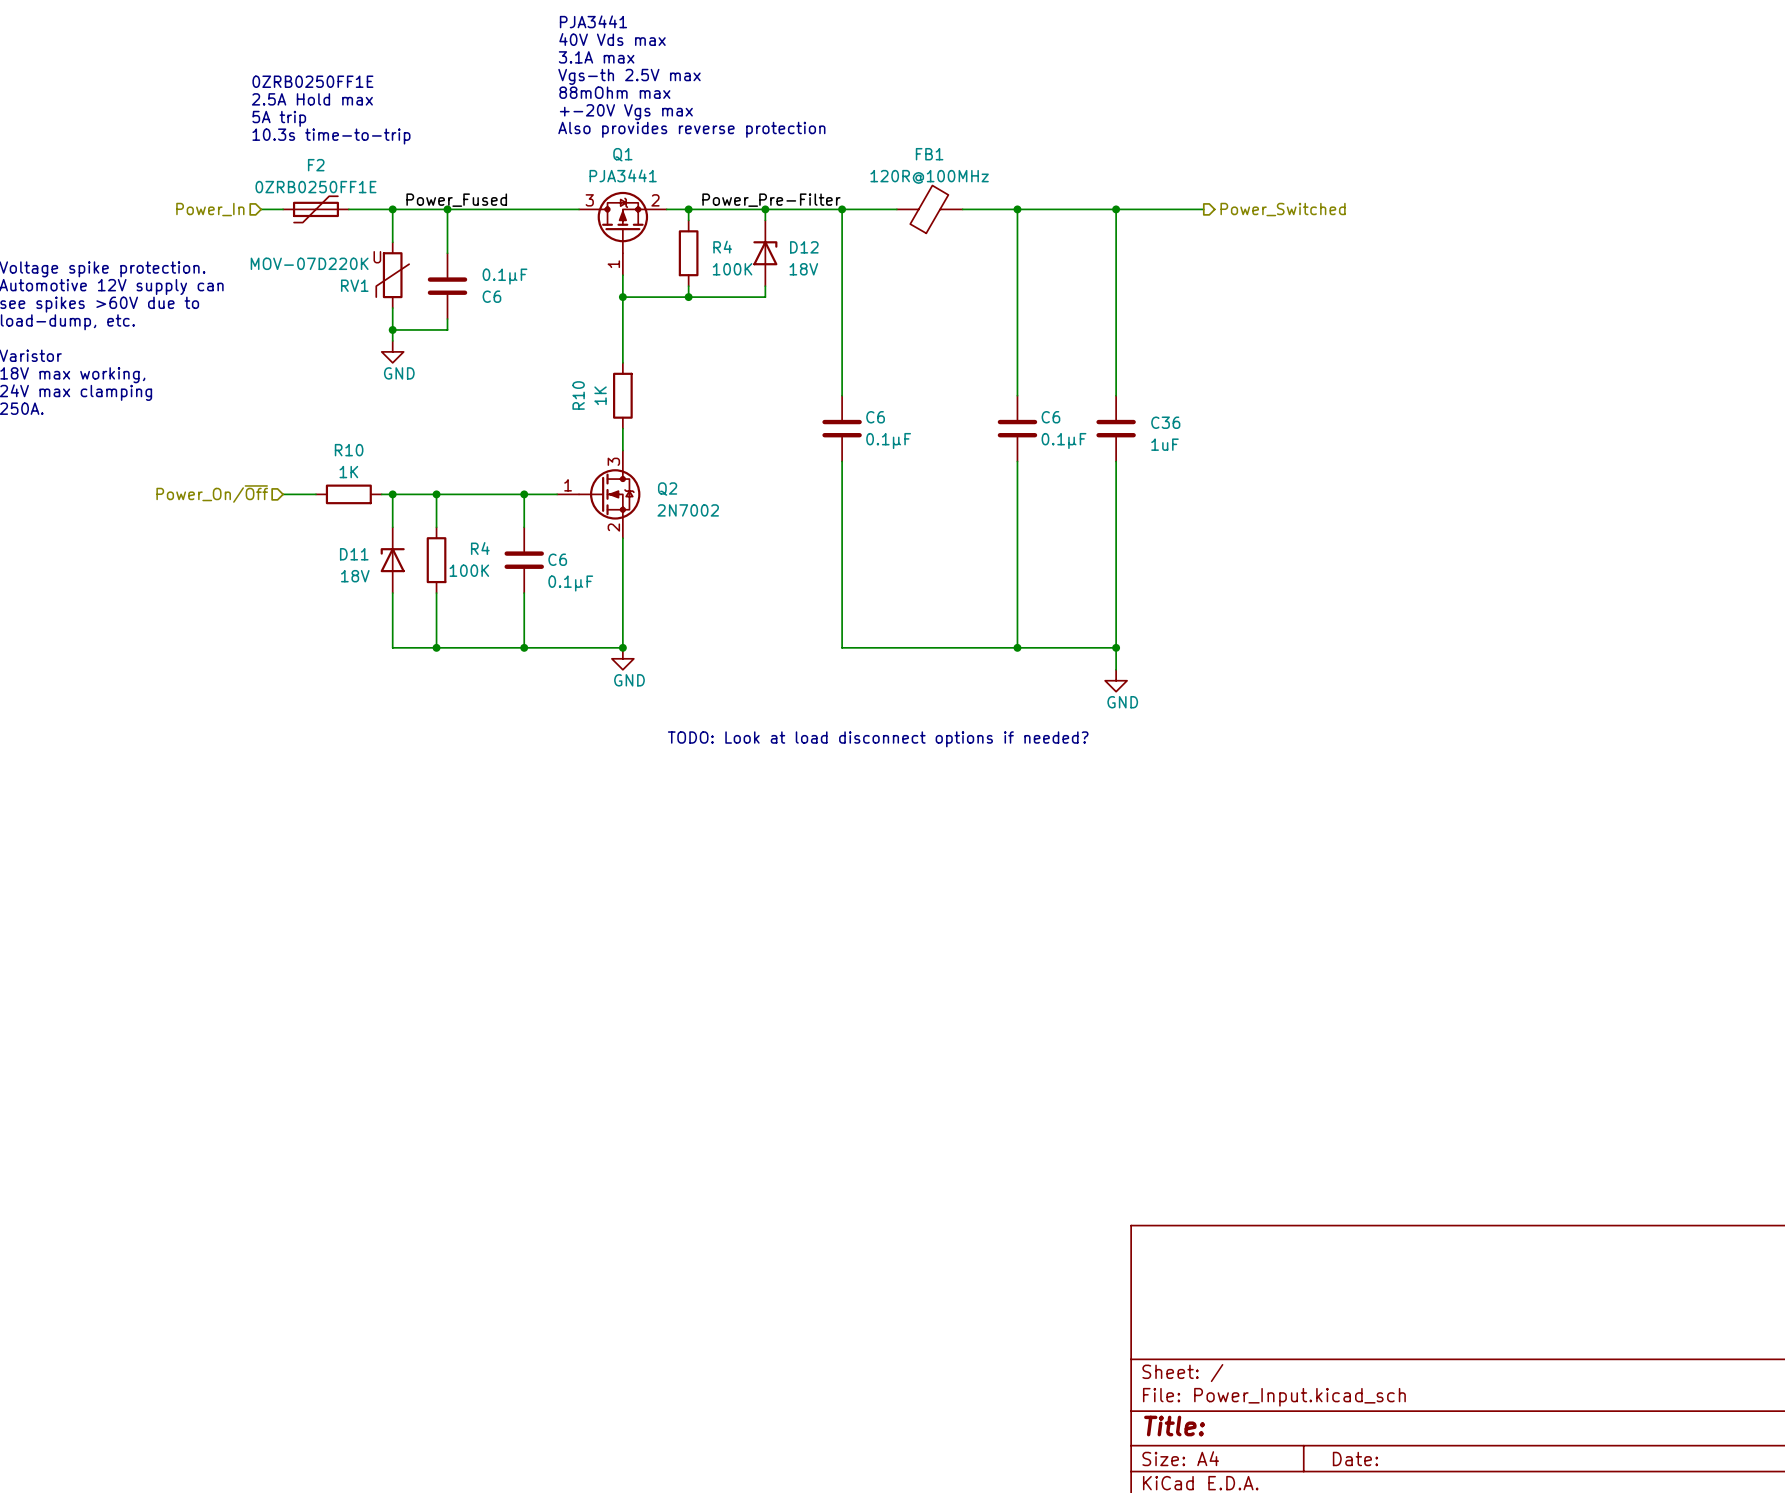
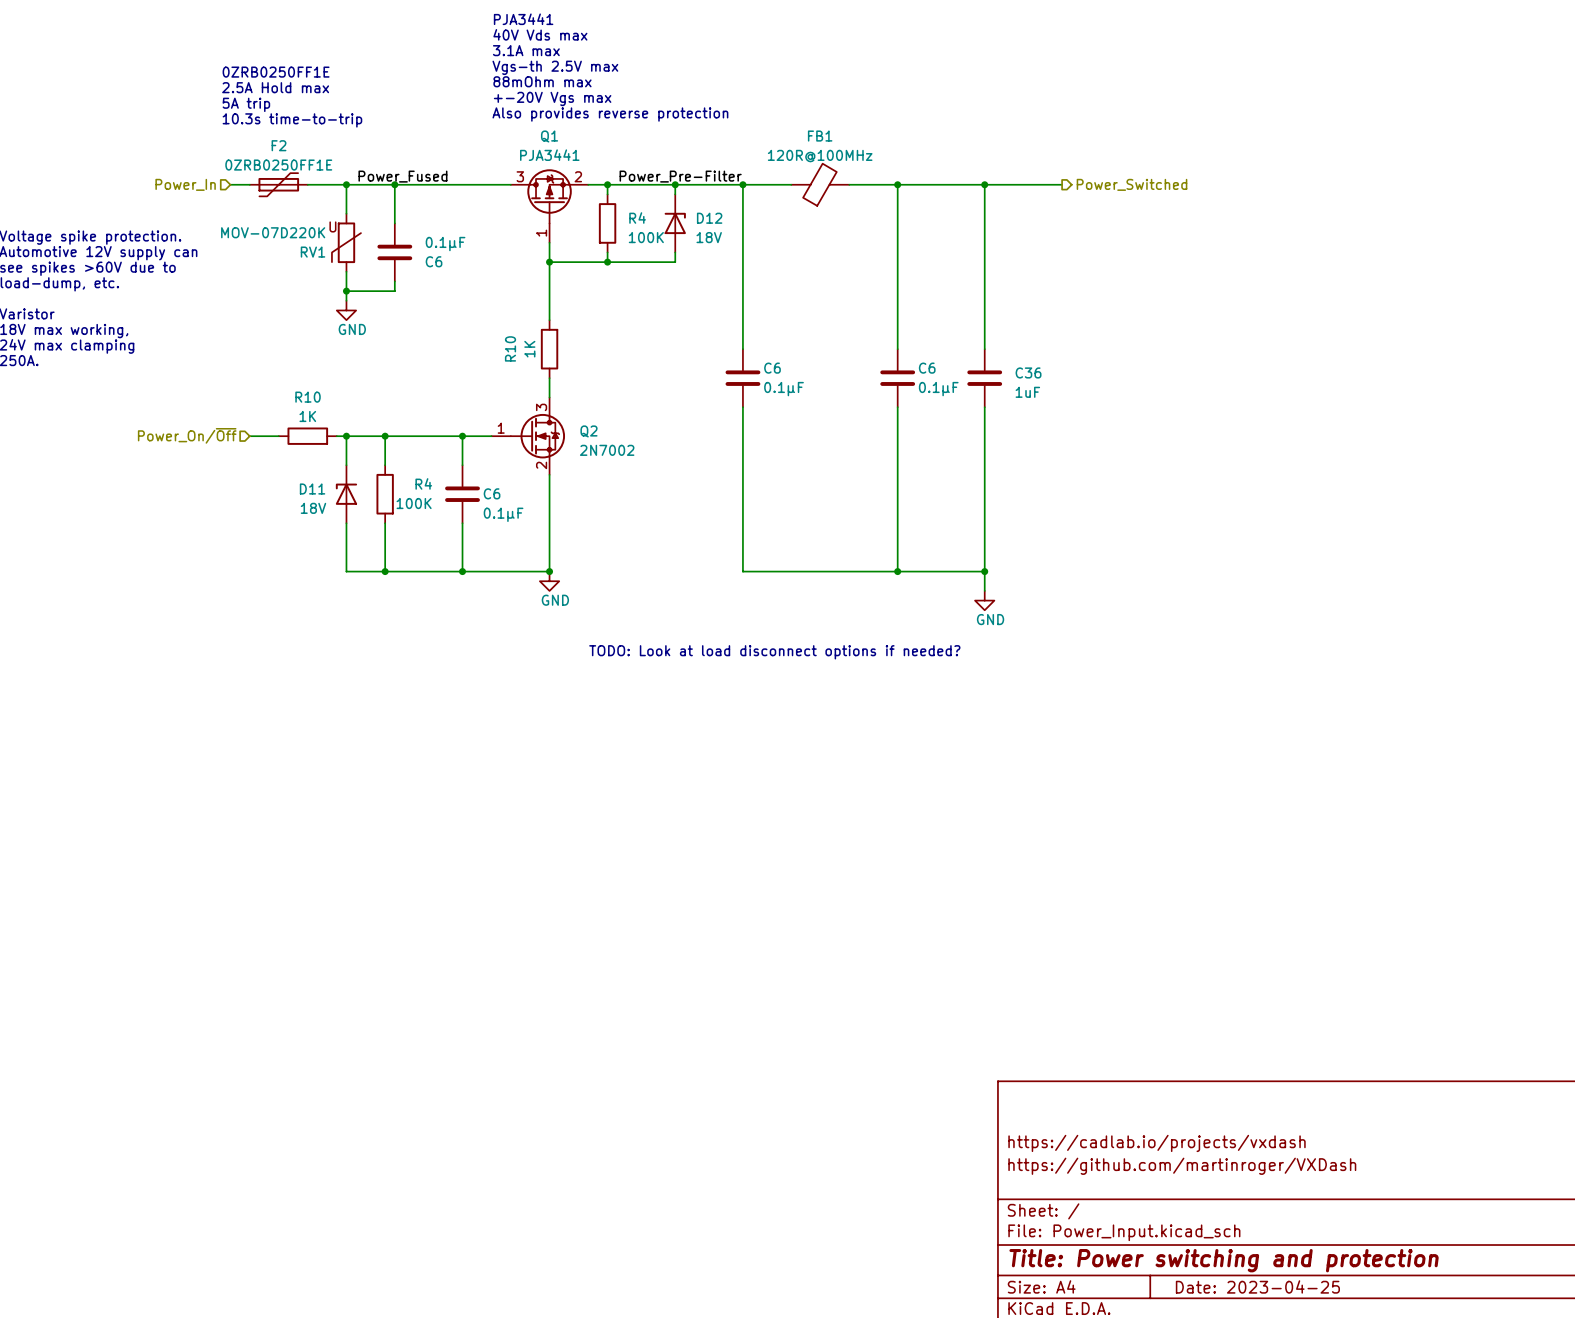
title block: none -> https://cadlab.io/projects/vxdash (1157, 1143)
title block: none -> https://github.com/martinroger/VXDash (1182, 1166)
title block: Title: (1174, 1426) -> Title: Power switching and protection (1224, 1260)
title block: Date: (1355, 1458) -> Date: 2023-04-25 (1257, 1286)

